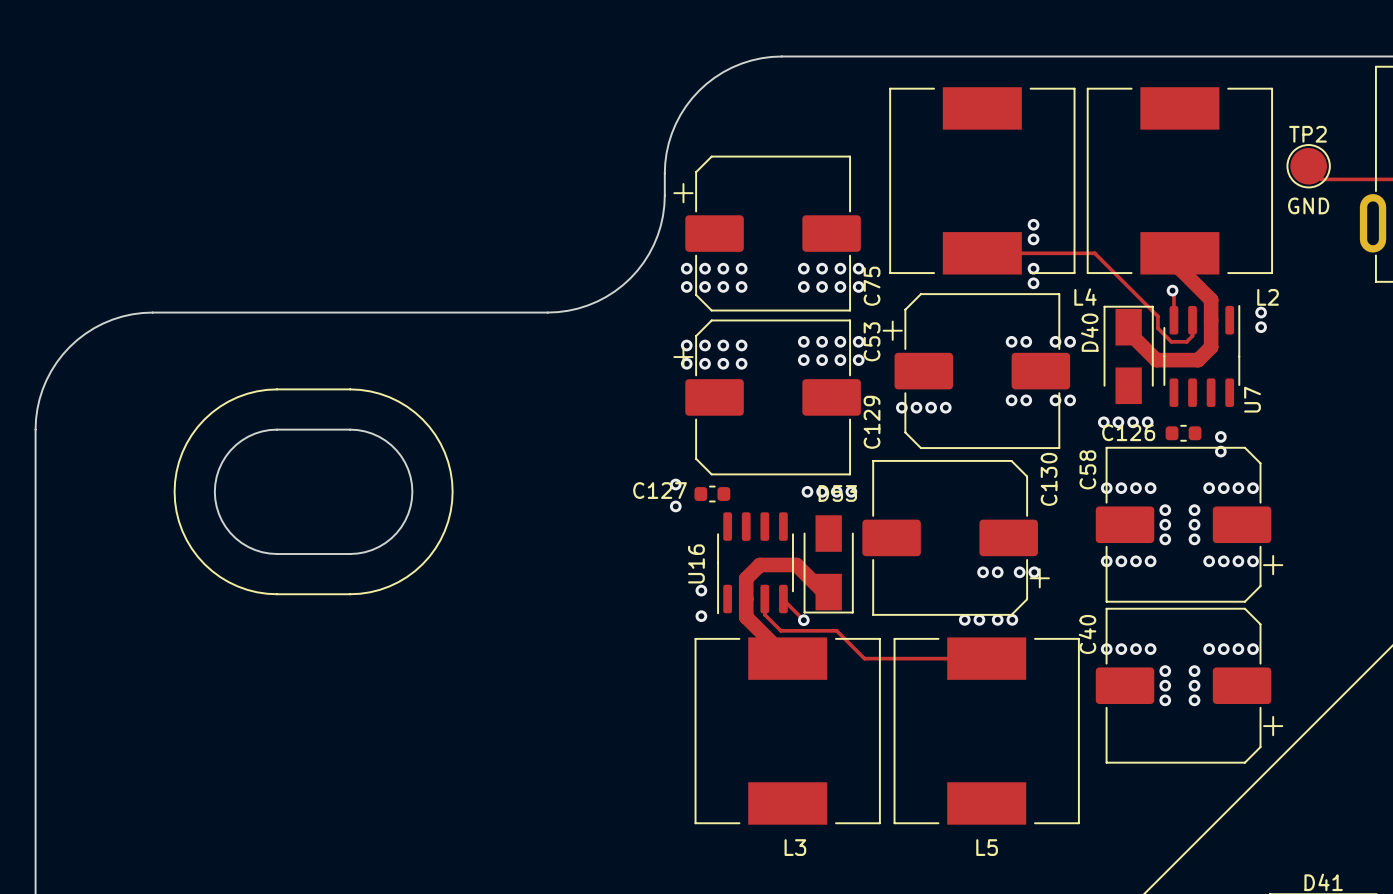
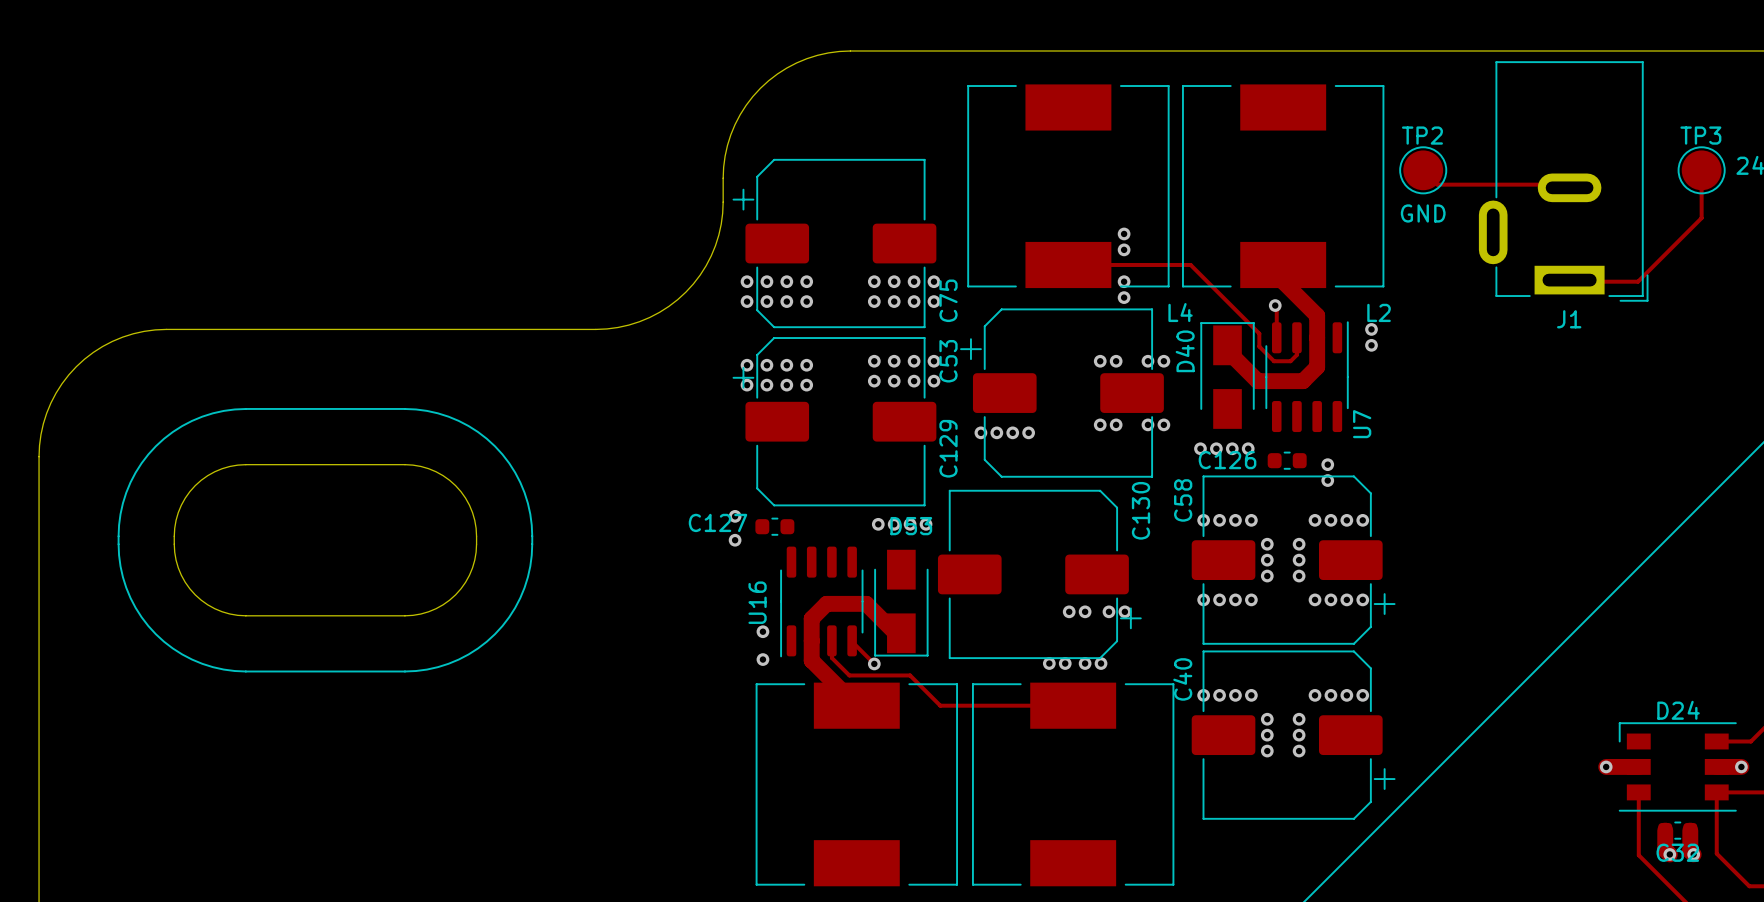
line: (277, 389) (350, 389) (379, 393) (398, 401) (415, 412) (435, 434) (444, 452) (450, 471) (452, 491) (450, 511) (444, 531) (435, 548) (422, 564) (407, 576) (389, 586) (360, 593) (266, 593) (247, 589) (228, 582) (212, 571) (191, 548) (179, 521) (174, 491) (176, 471) (186, 443) (204, 419) (228, 401) (257, 391) (277, 389) -> (245, 408) (223, 410) (202, 416) (172, 431) (148, 454) (135, 472) (126, 492) (120, 514) (118, 536) (119, 555) (122, 577) (135, 607) (148, 626) (164, 641) (182, 654) (202, 663) (234, 671) (416, 671) (448, 663) (468, 654) (486, 641) (502, 626) (515, 607) (527, 577) (531, 555) (531, 525) (524, 492) (515, 472) (502, 454) (486, 438) (468, 426) (448, 416) (416, 409) (245, 408)
board edge: (277, 429) (357, 430) (379, 436) (391, 445) (405, 462) (411, 484) (411, 499) (408, 513) (396, 533) (379, 546) (365, 552) (350, 554) (269, 553) (248, 546) (235, 538) (221, 520) (216, 506) (214, 491) (218, 469) (230, 450) (241, 440) (254, 433) (277, 429) -> (245, 464) (222, 468) (201, 480) (185, 498) (176, 520) (174, 552) (181, 575) (195, 594) (214, 608) (229, 614) (245, 615) (412, 615) (428, 611) (449, 600) (460, 588) (469, 575) (474, 560) (476, 544) (476, 528) (472, 512) (460, 491) (449, 480) (436, 471) (420, 466) (404, 464) (245, 464)

